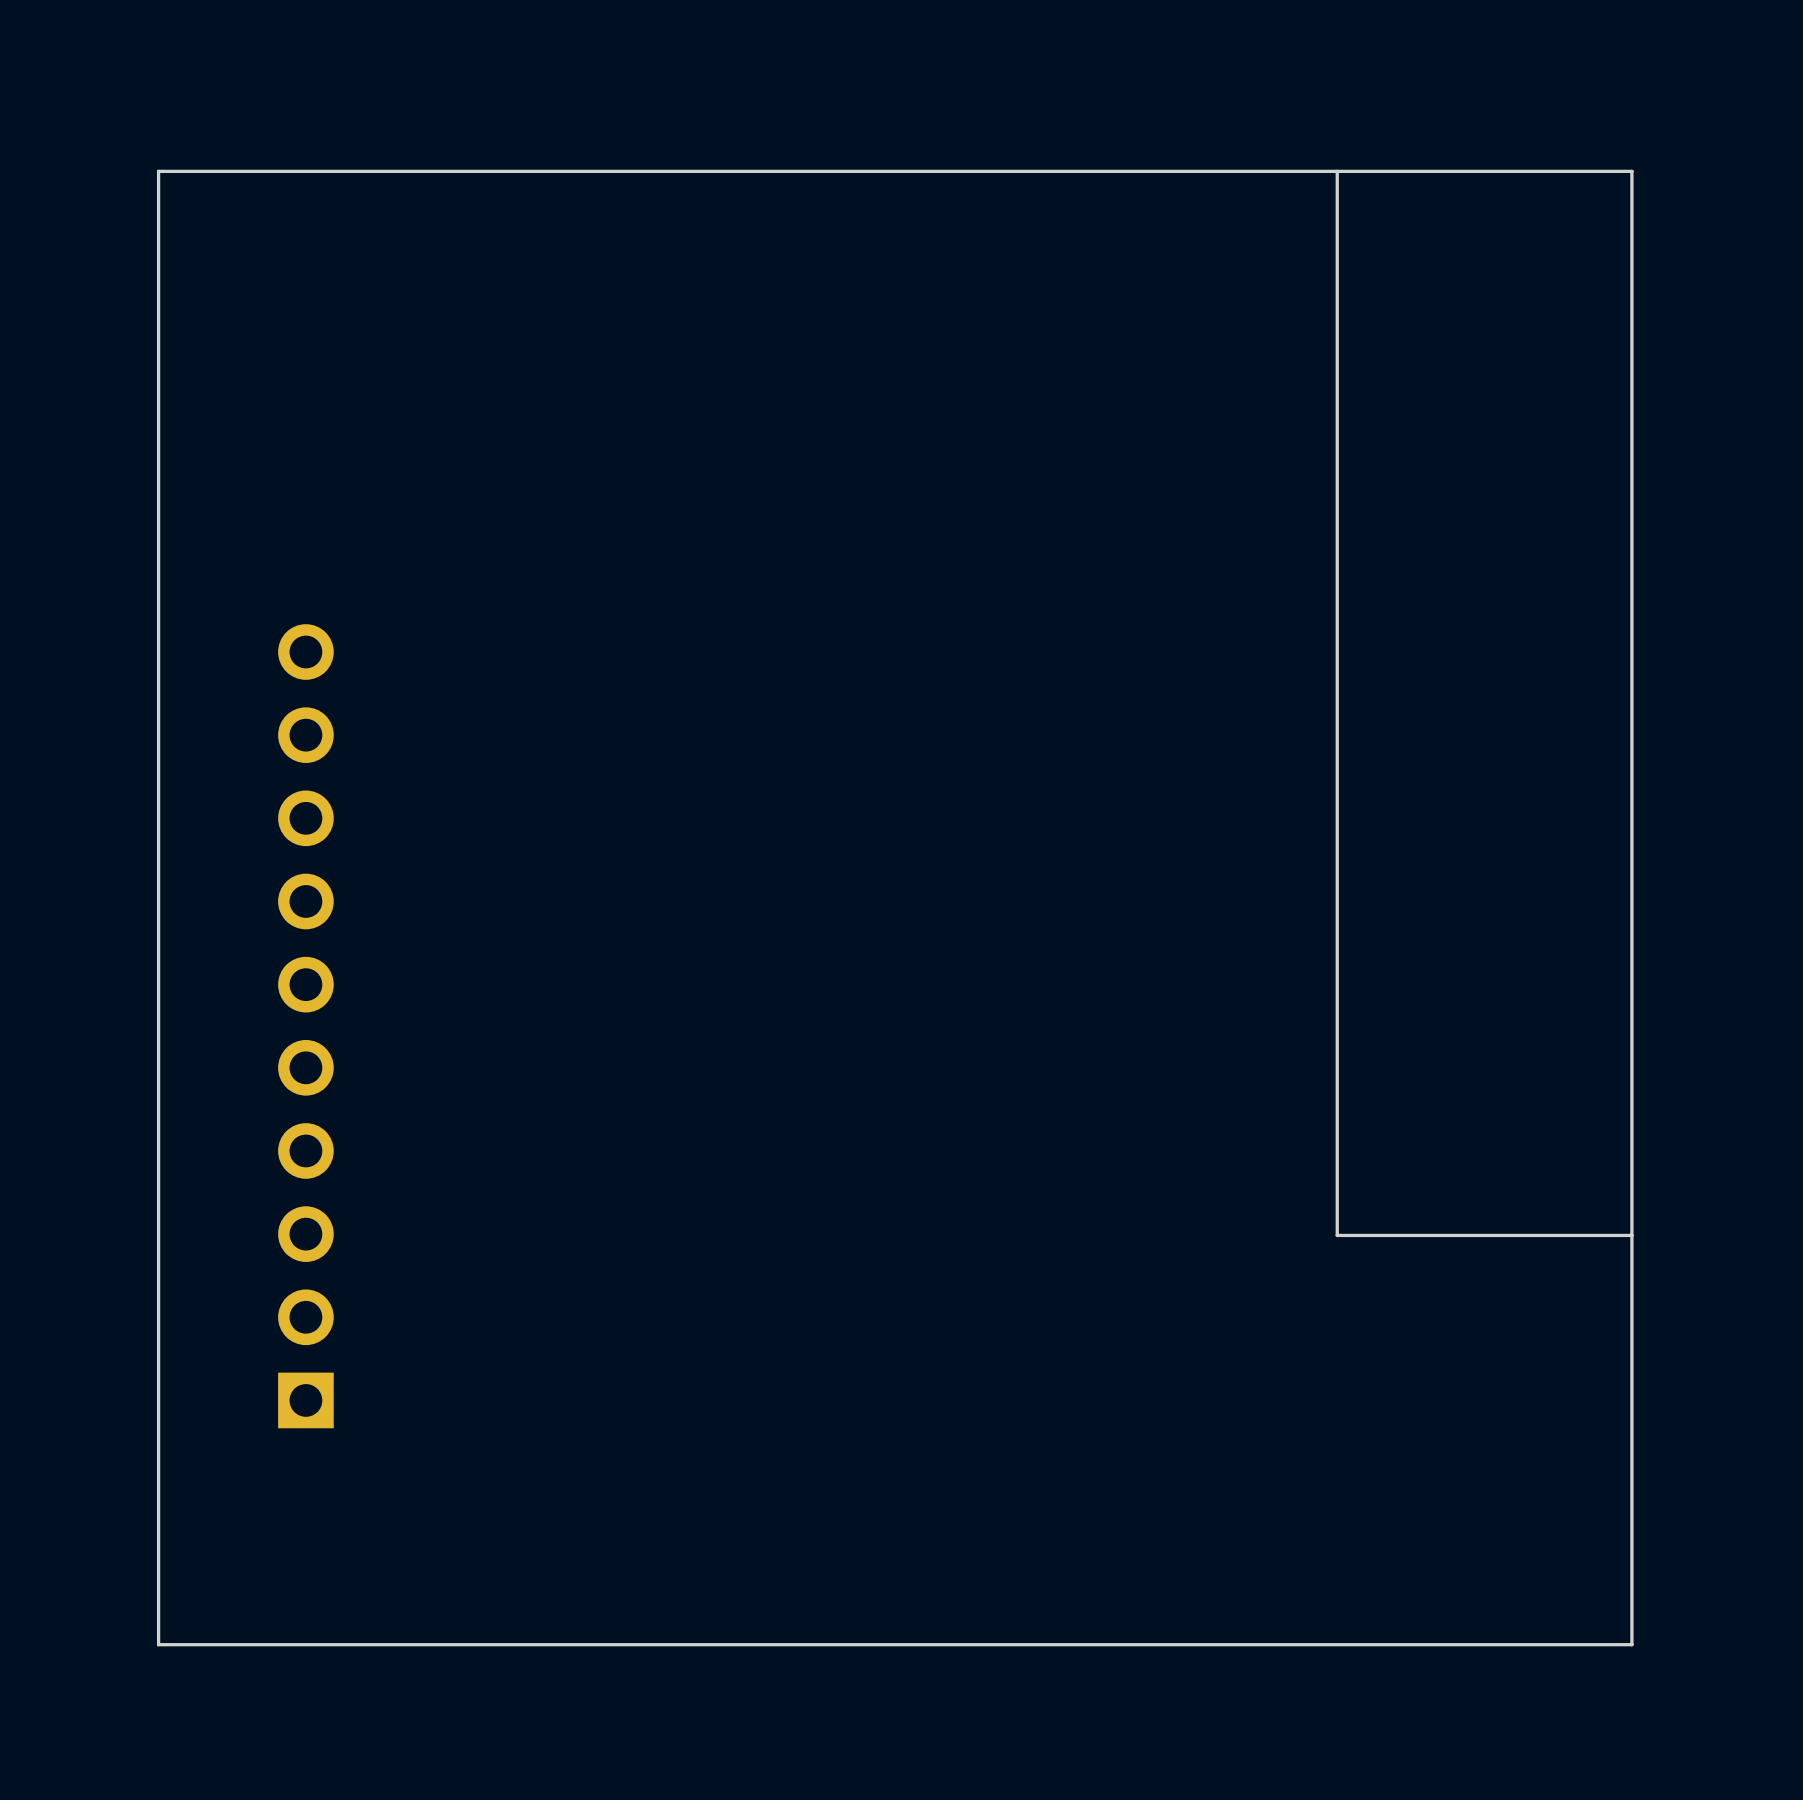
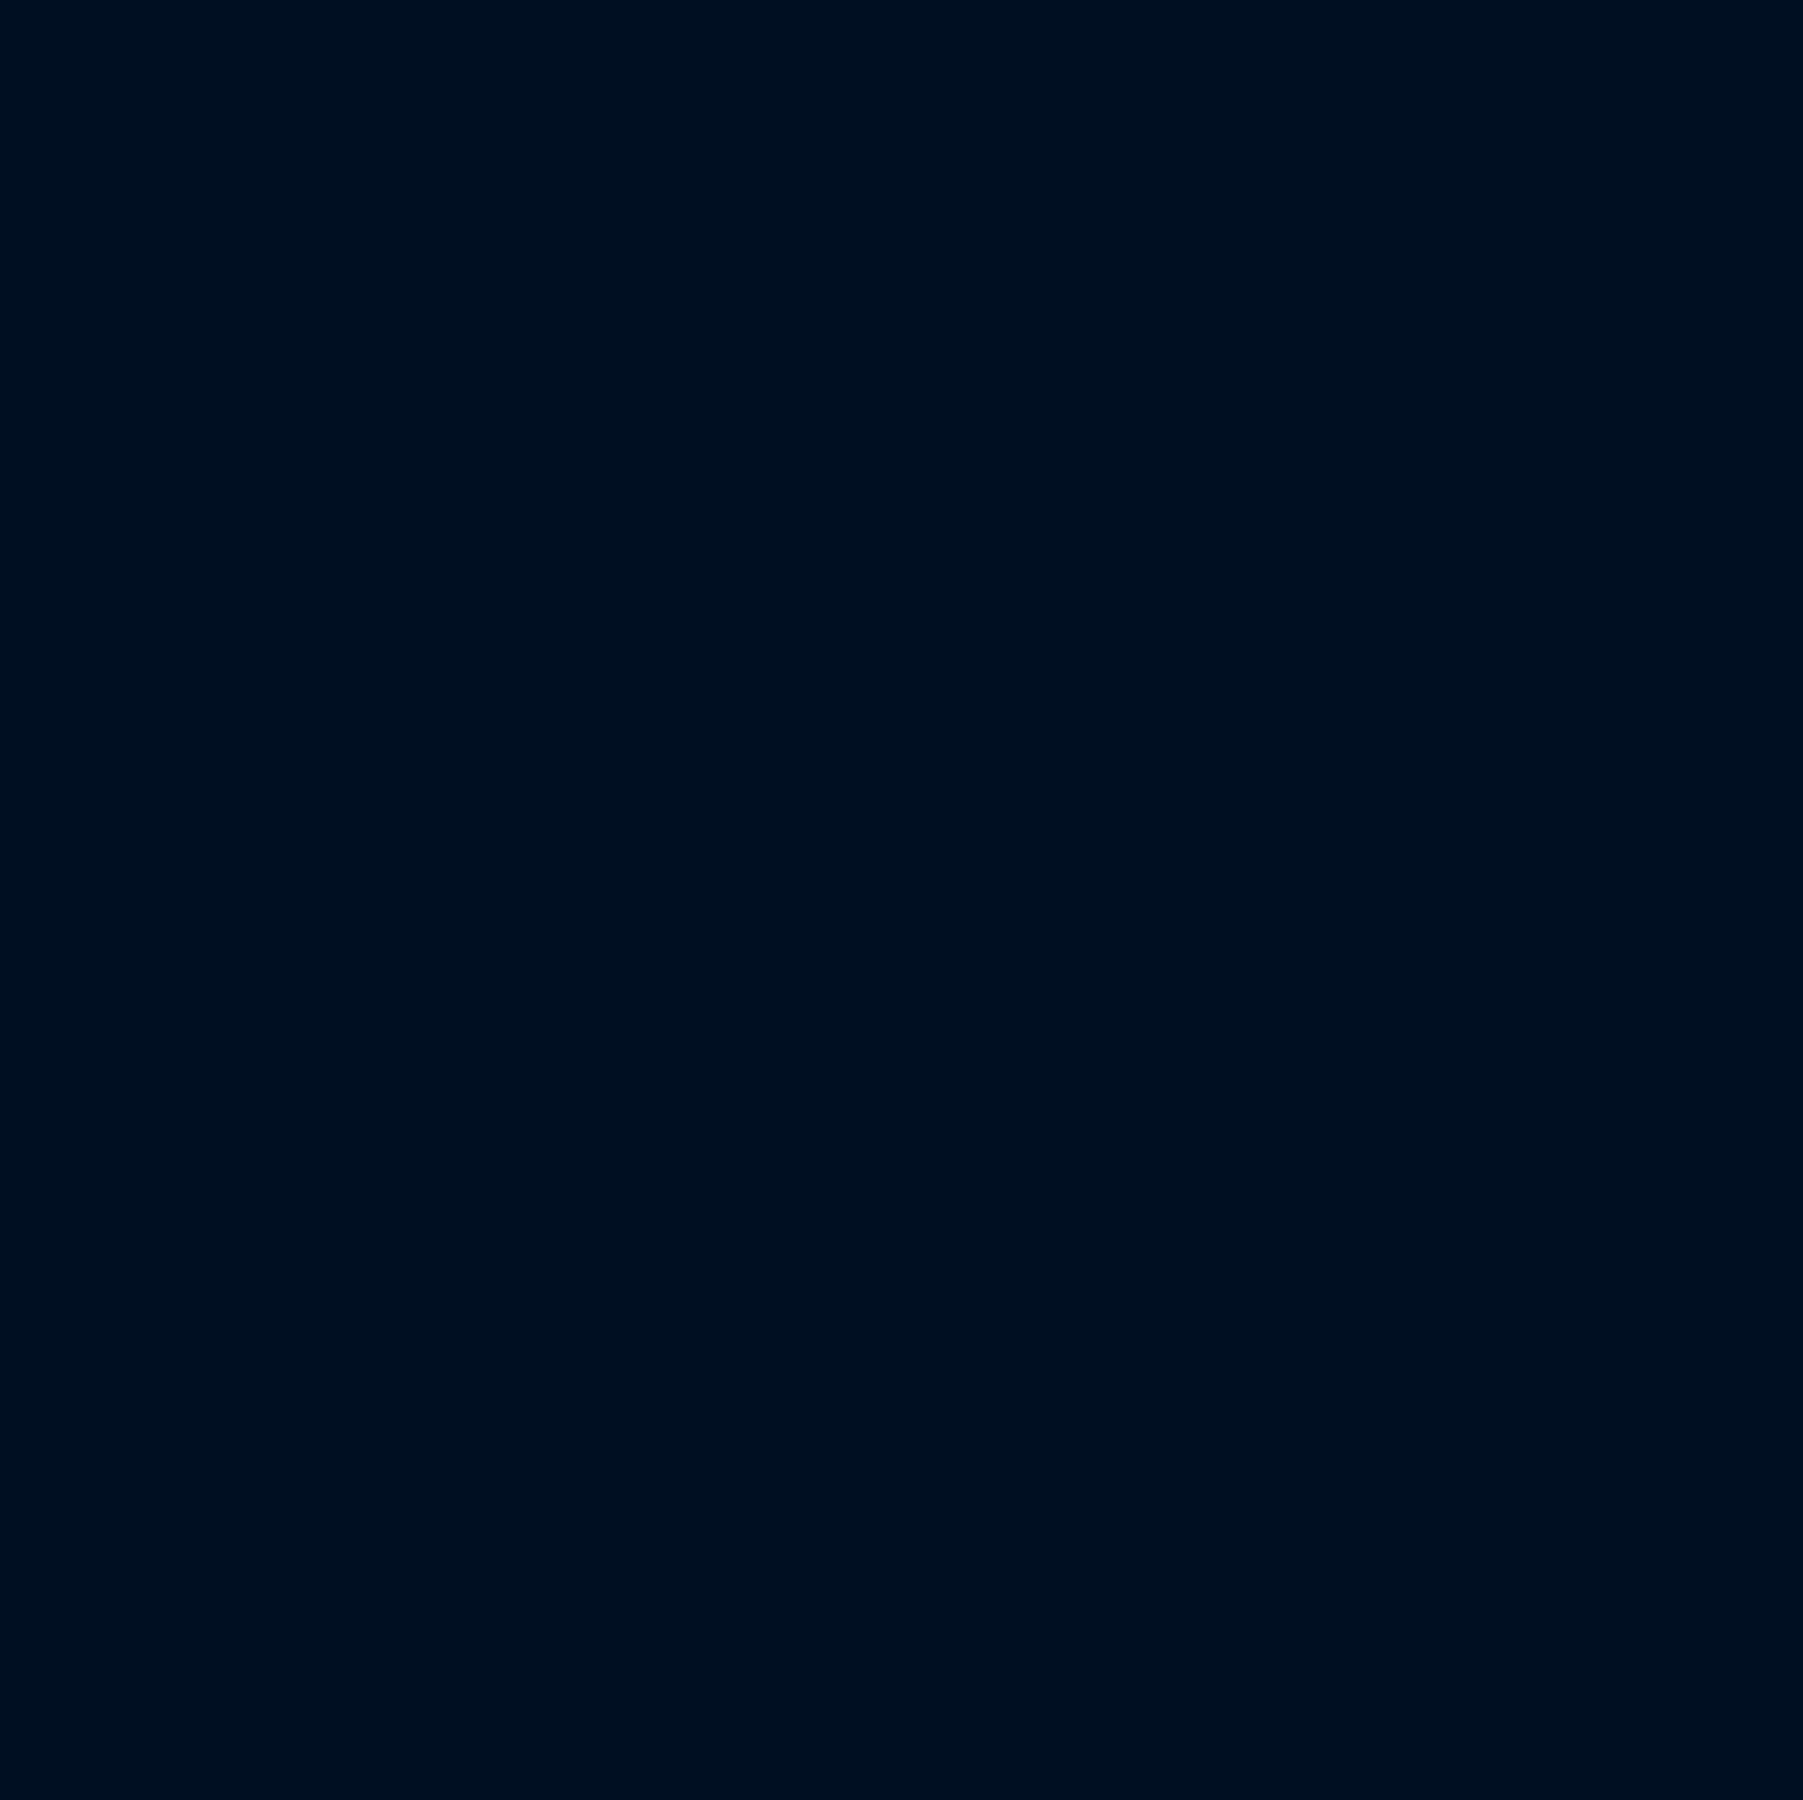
board edge: (1337, 171) (1337, 1235) (1631, 1235) -> none
board edge: (1631, 171) (158, 171) (158, 1644) (1631, 1644) (1631, 171) -> none
part: (305, 1026) -> none

